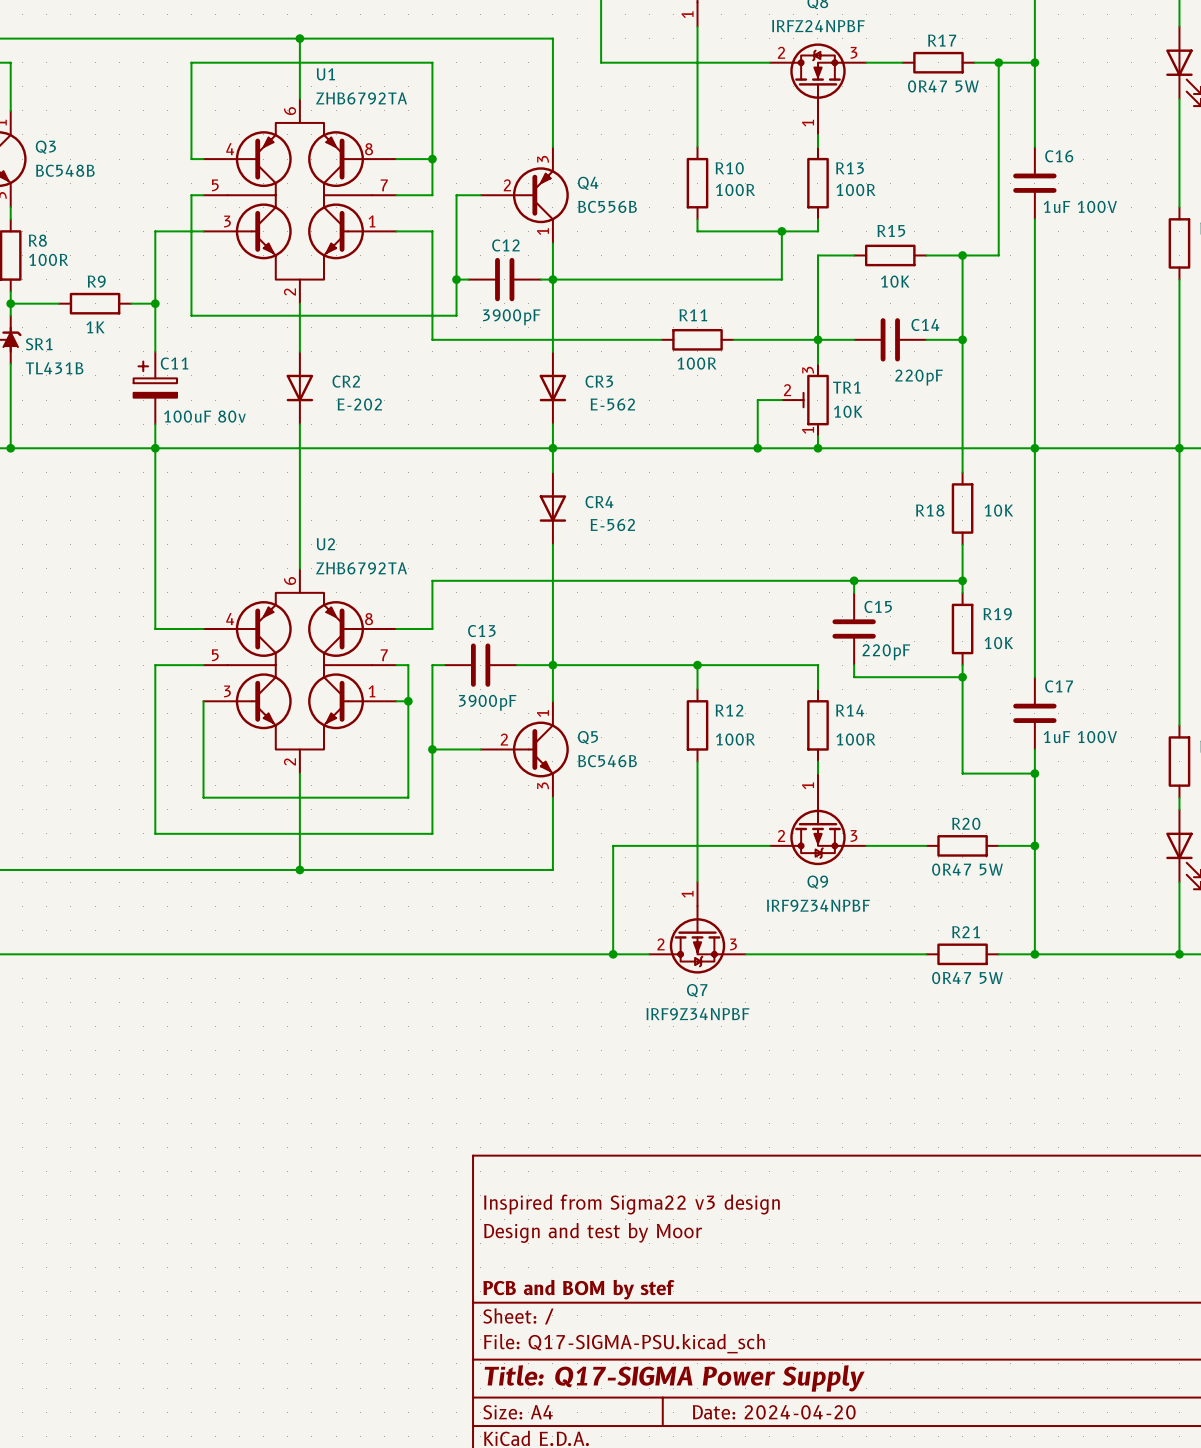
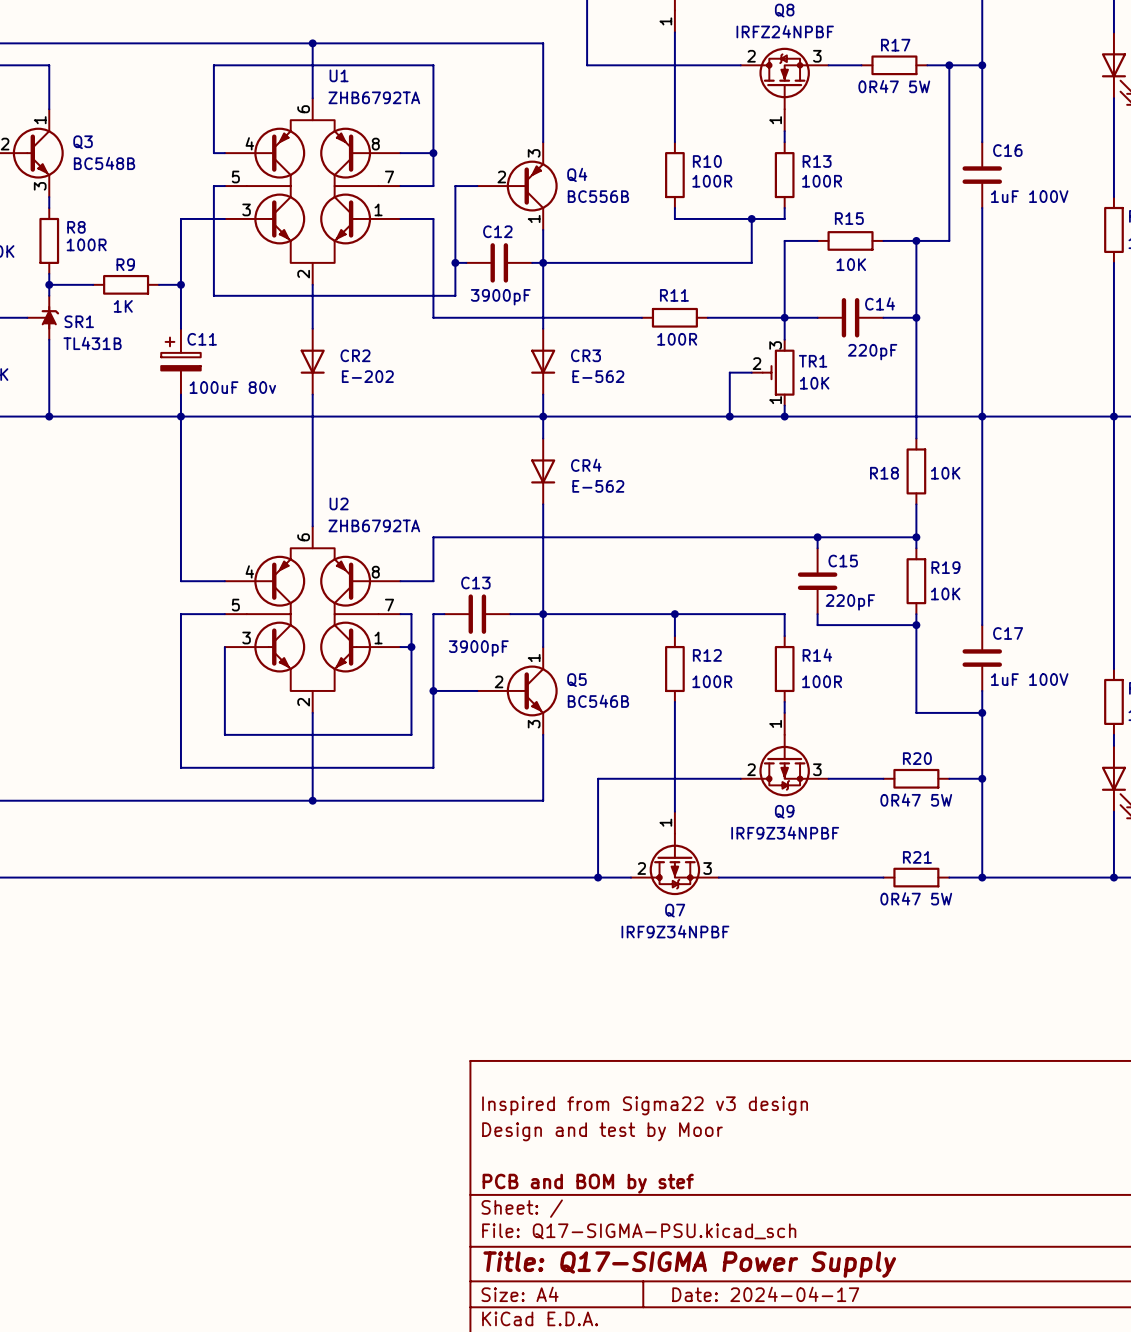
title block: Date: 2024-04-20 (774, 1412) -> Date: 2024-04-17 (765, 1294)

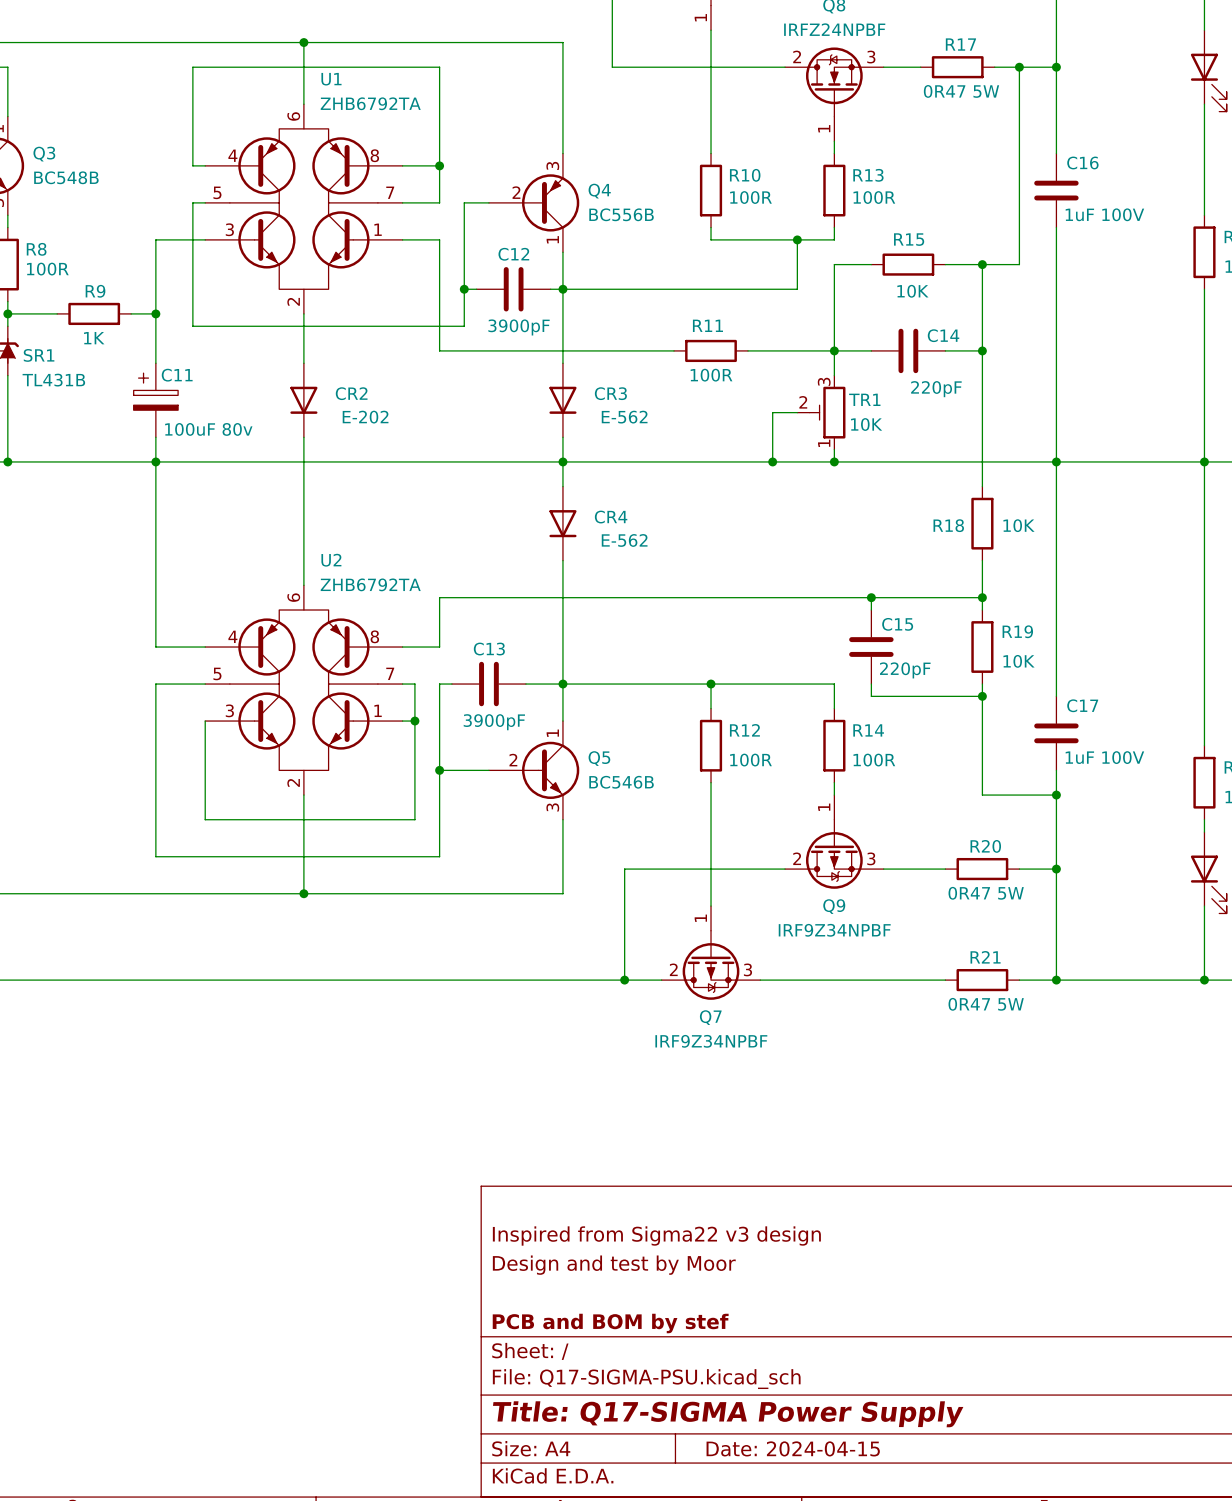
title block: Date: 2024-04-17 (765, 1294) -> Date: 2024-04-15 (793, 1448)

